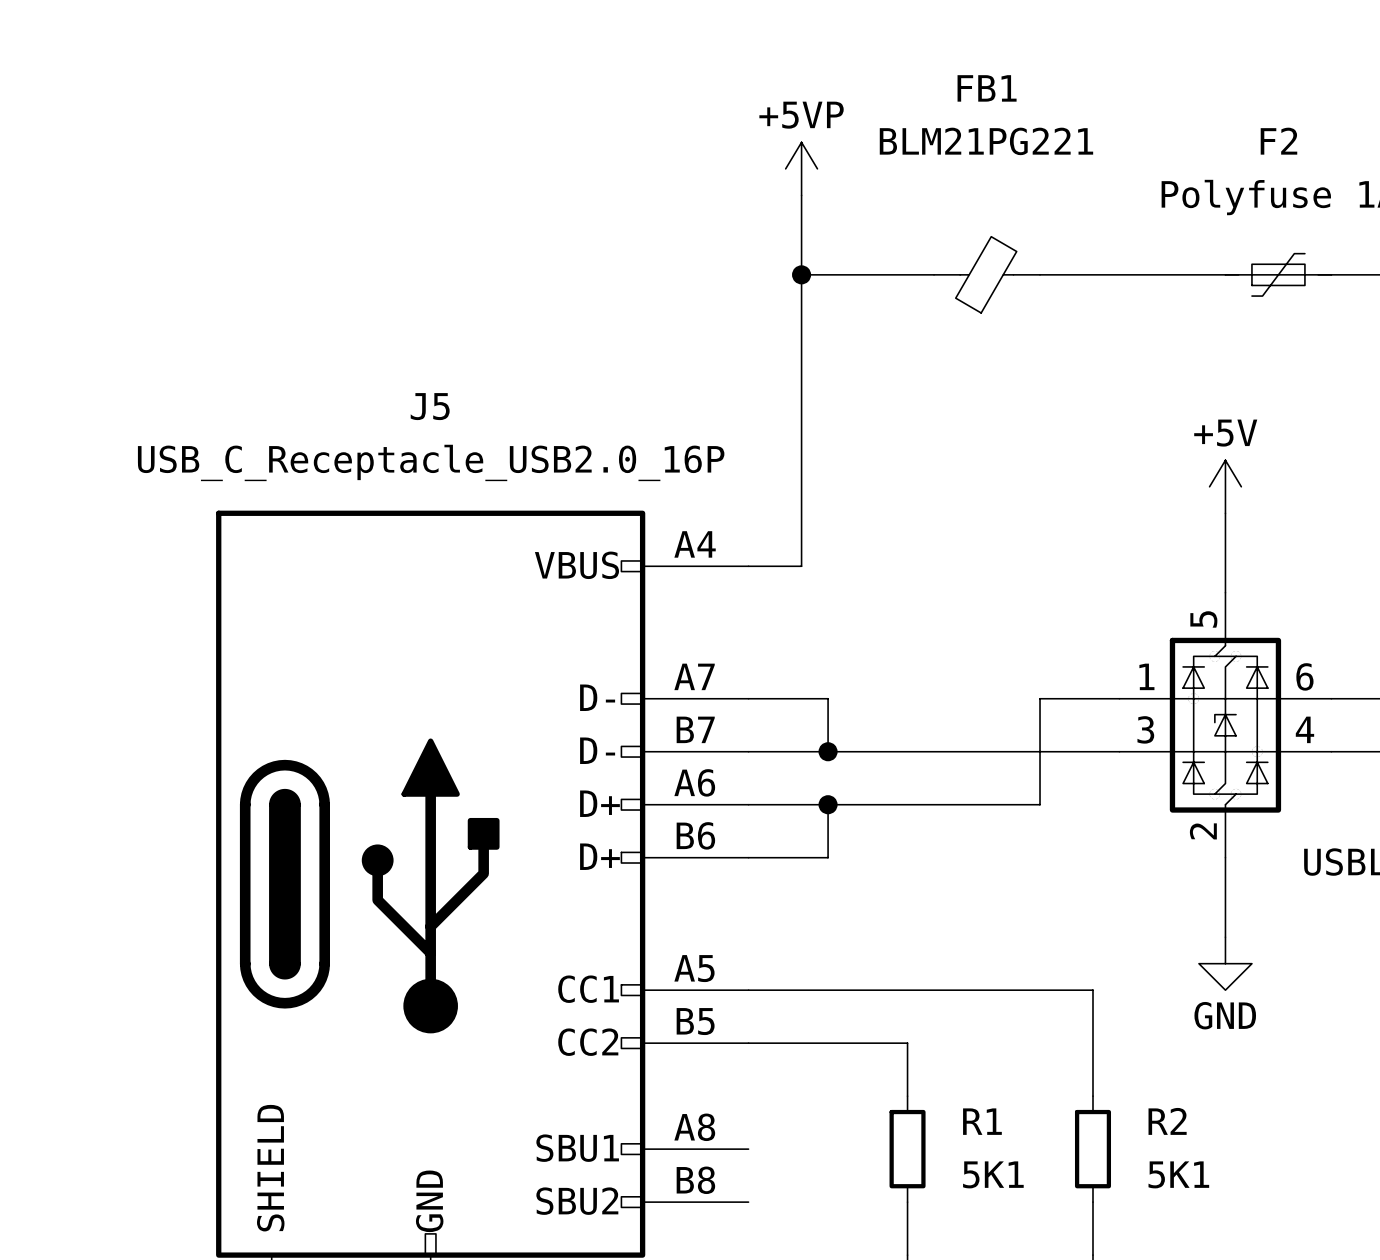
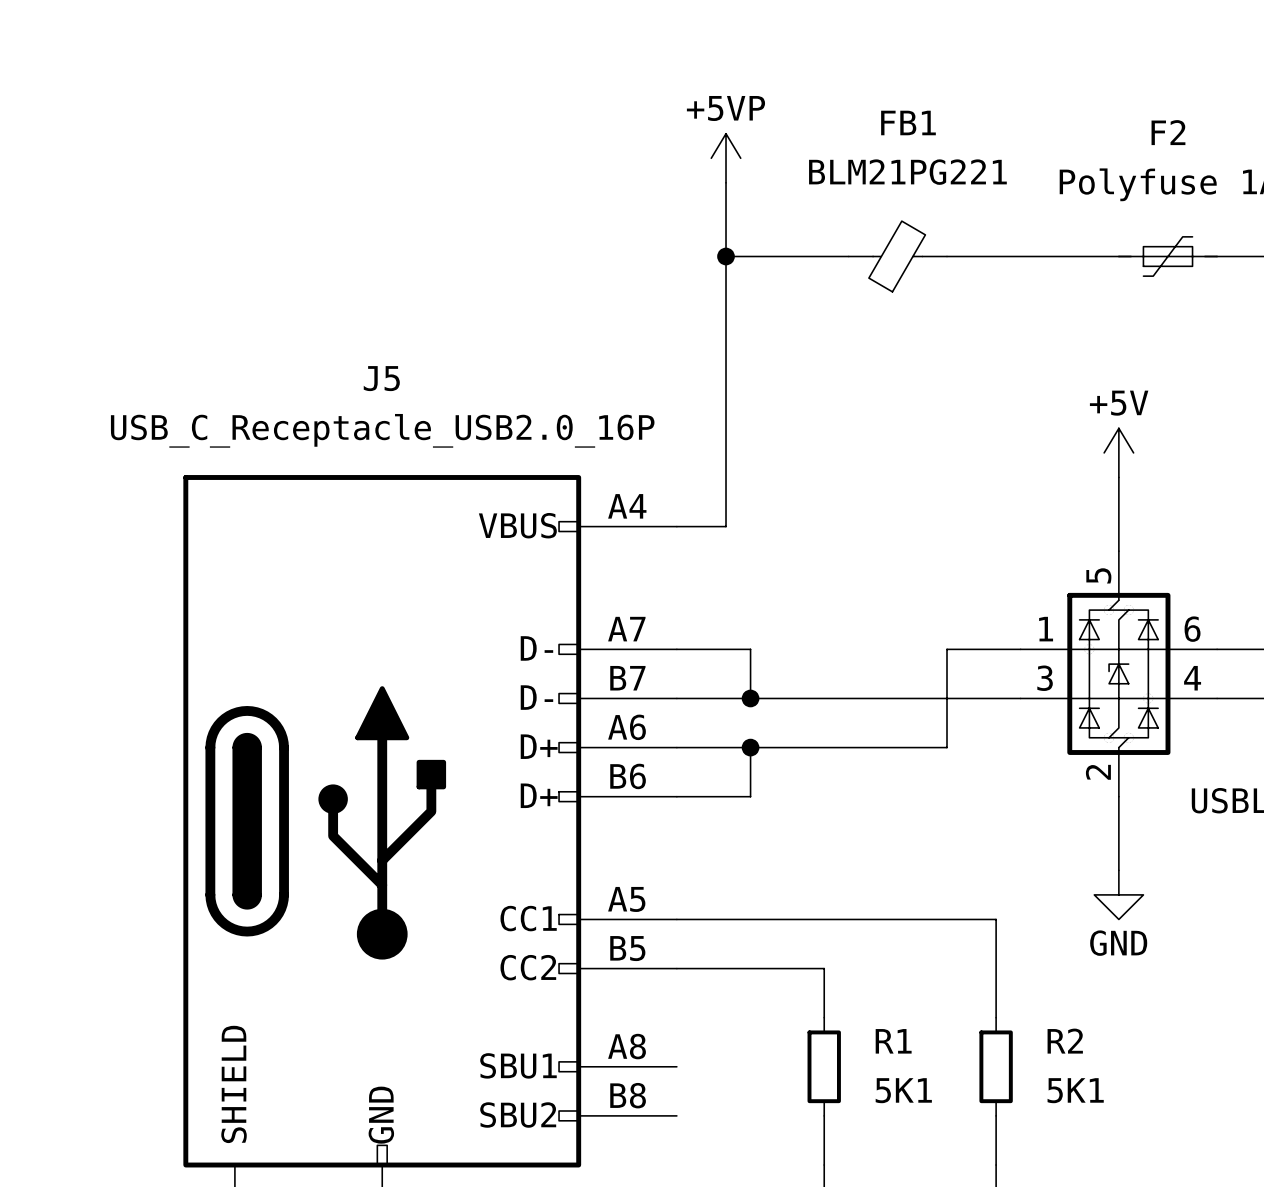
FB1 name position: FB1 (987, 88) -> FB1 (908, 122)
FB1 value position: BLM21PG221 (986, 141) -> BLM21PG221 (907, 172)

